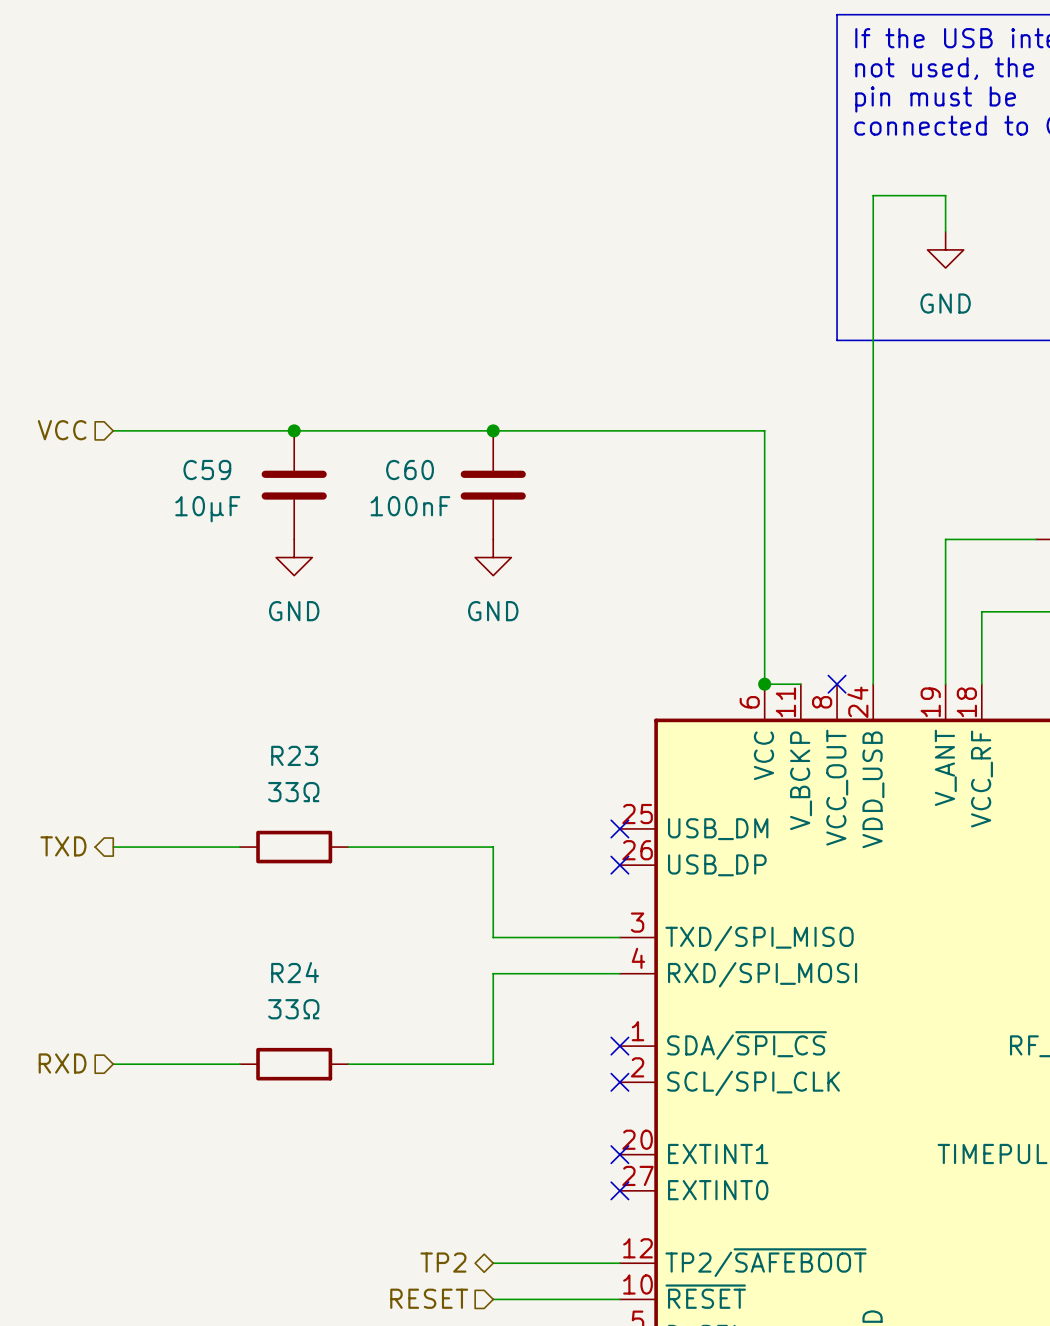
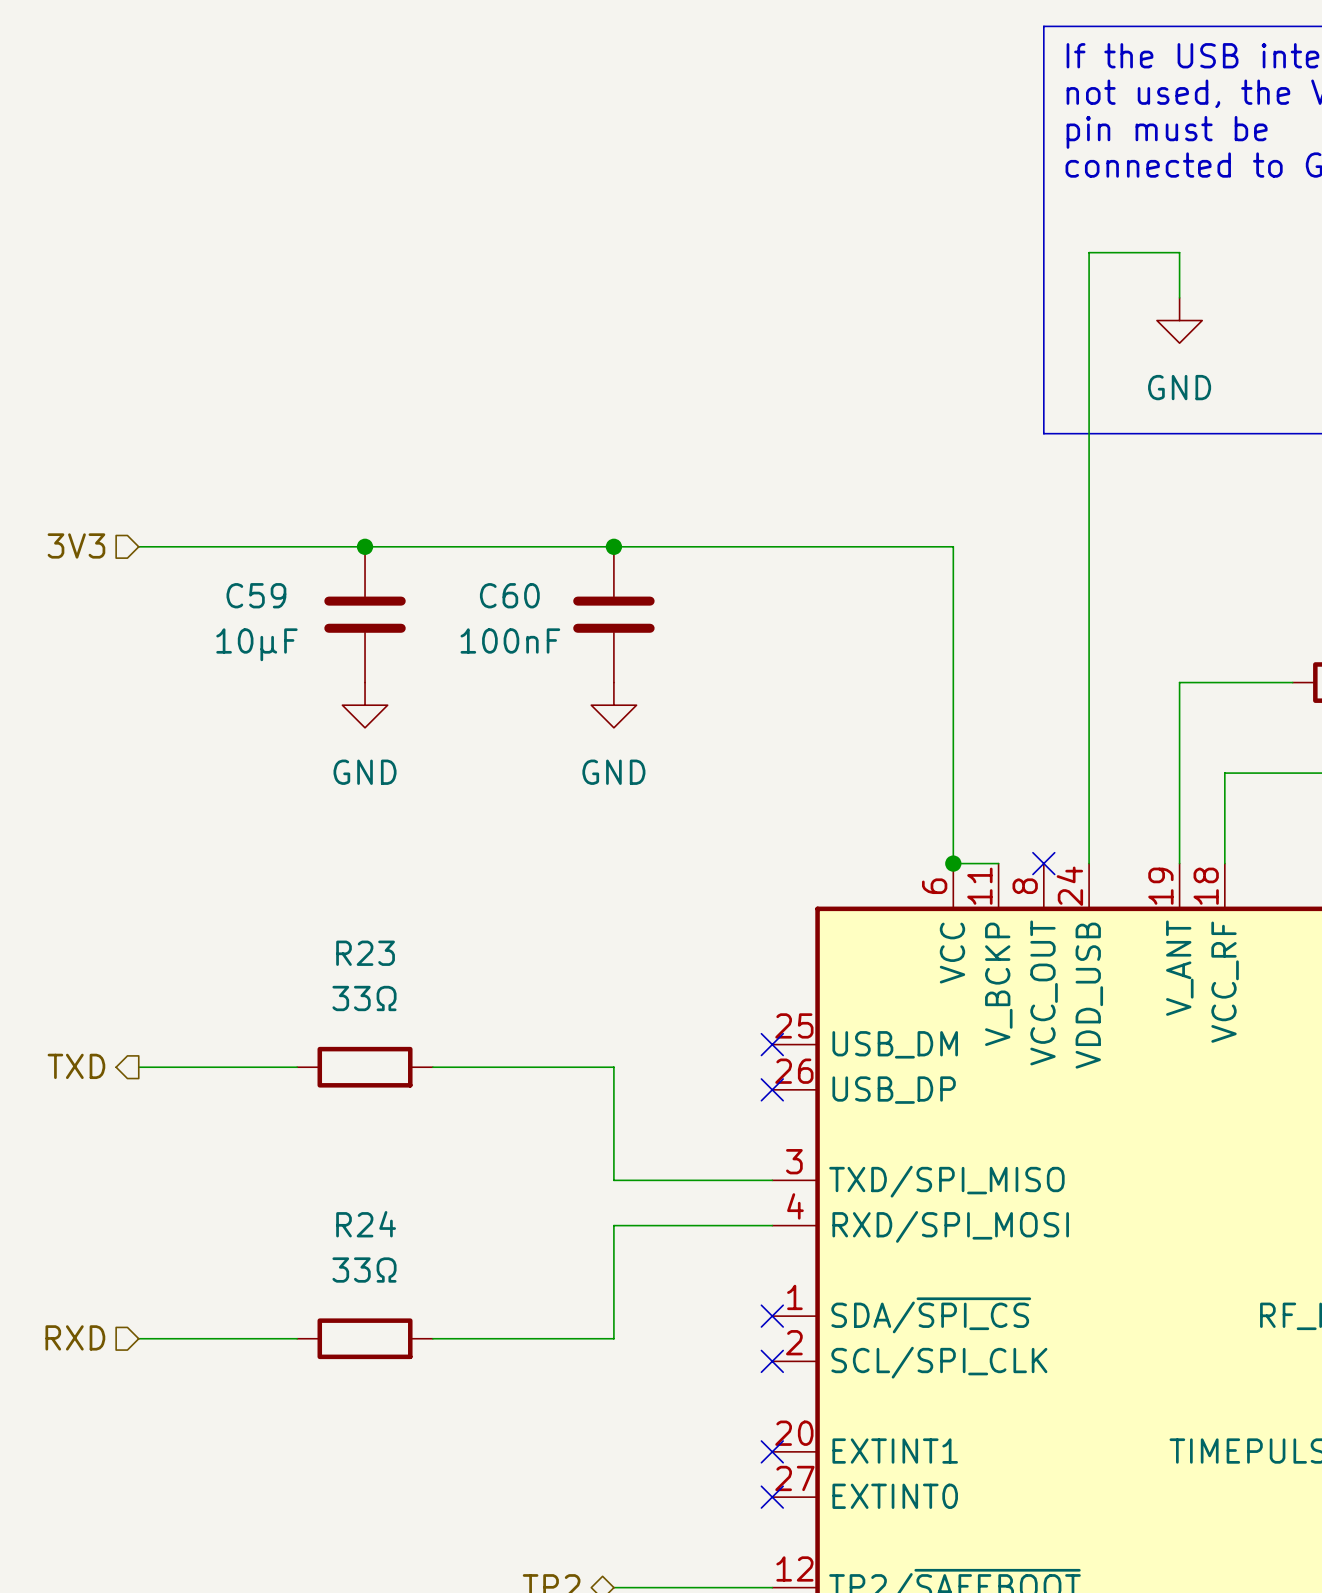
hierarchical label: VCC (62, 430) -> 3V3 (76, 545)

